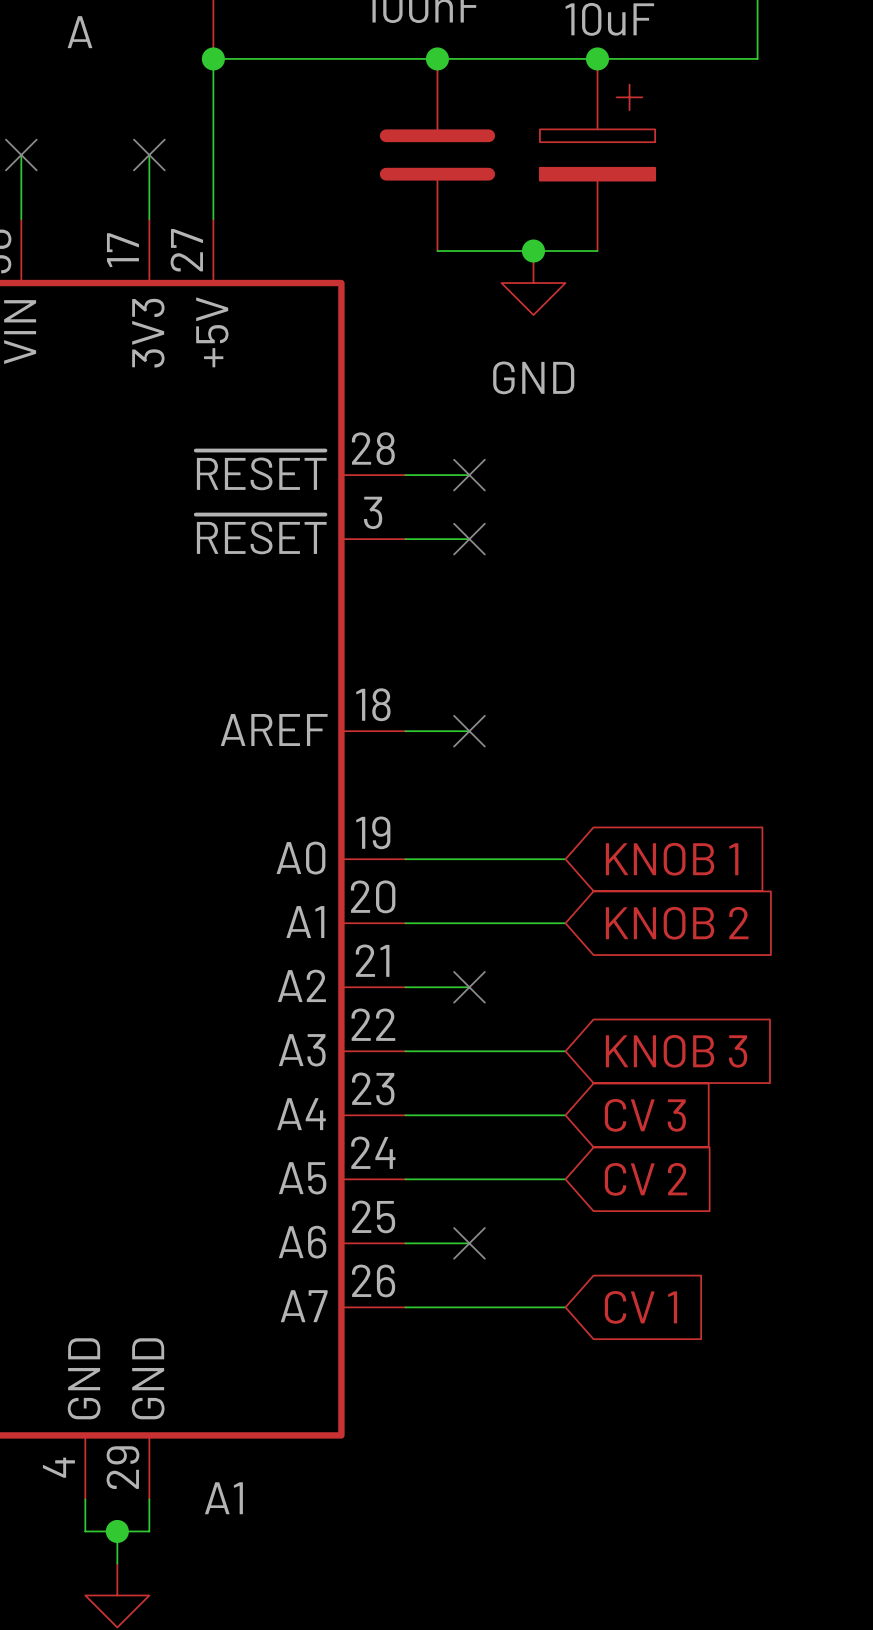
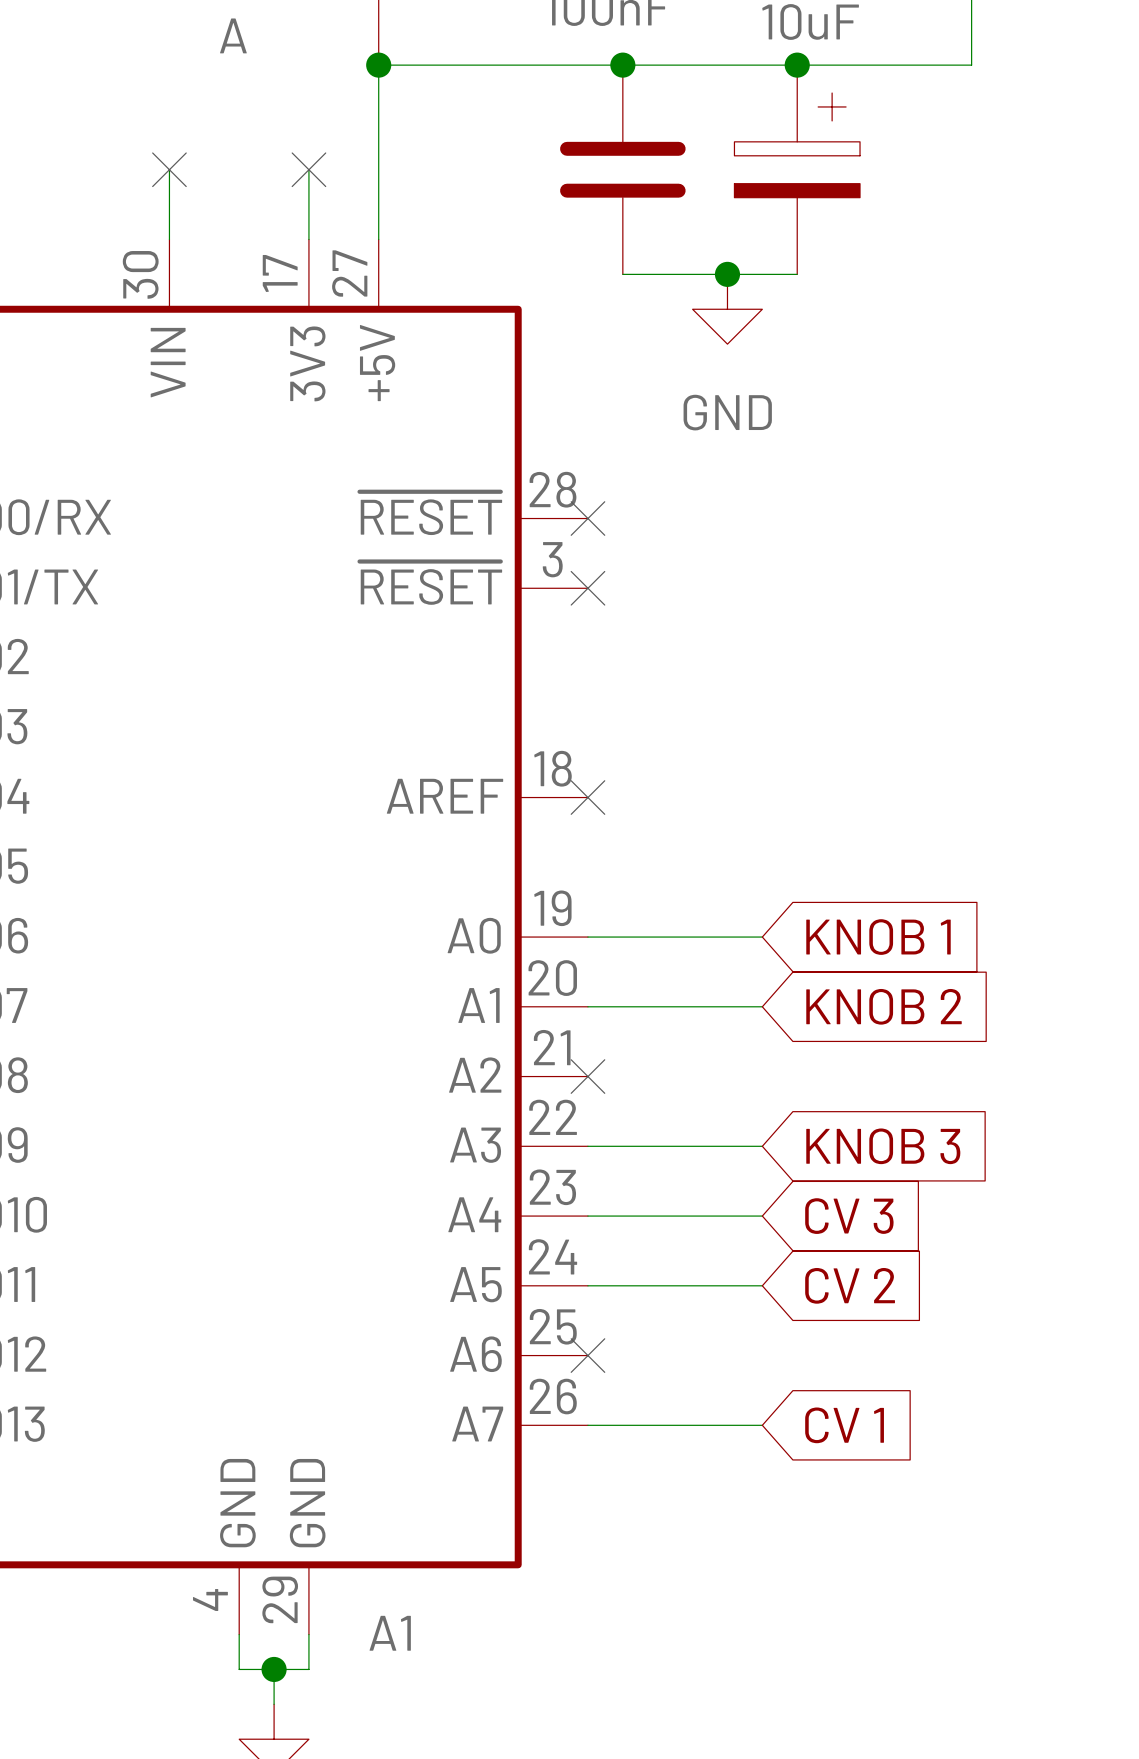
wire: (405, 475) (469, 475) -> none
no-connect mark: none -> (587, 518)
no-connect mark: (469, 475) -> none
wire: (405, 539) (469, 539) -> none
no-connect mark: none -> (587, 588)
no-connect mark: (469, 539) -> none
wire: (405, 731) (469, 731) -> none
no-connect mark position: (469, 731) -> (587, 797)
wire: (405, 987) (469, 987) -> none
no-connect mark position: (469, 987) -> (587, 1076)
wire: (405, 1243) (469, 1243) -> none
no-connect mark position: (469, 1243) -> (587, 1355)

